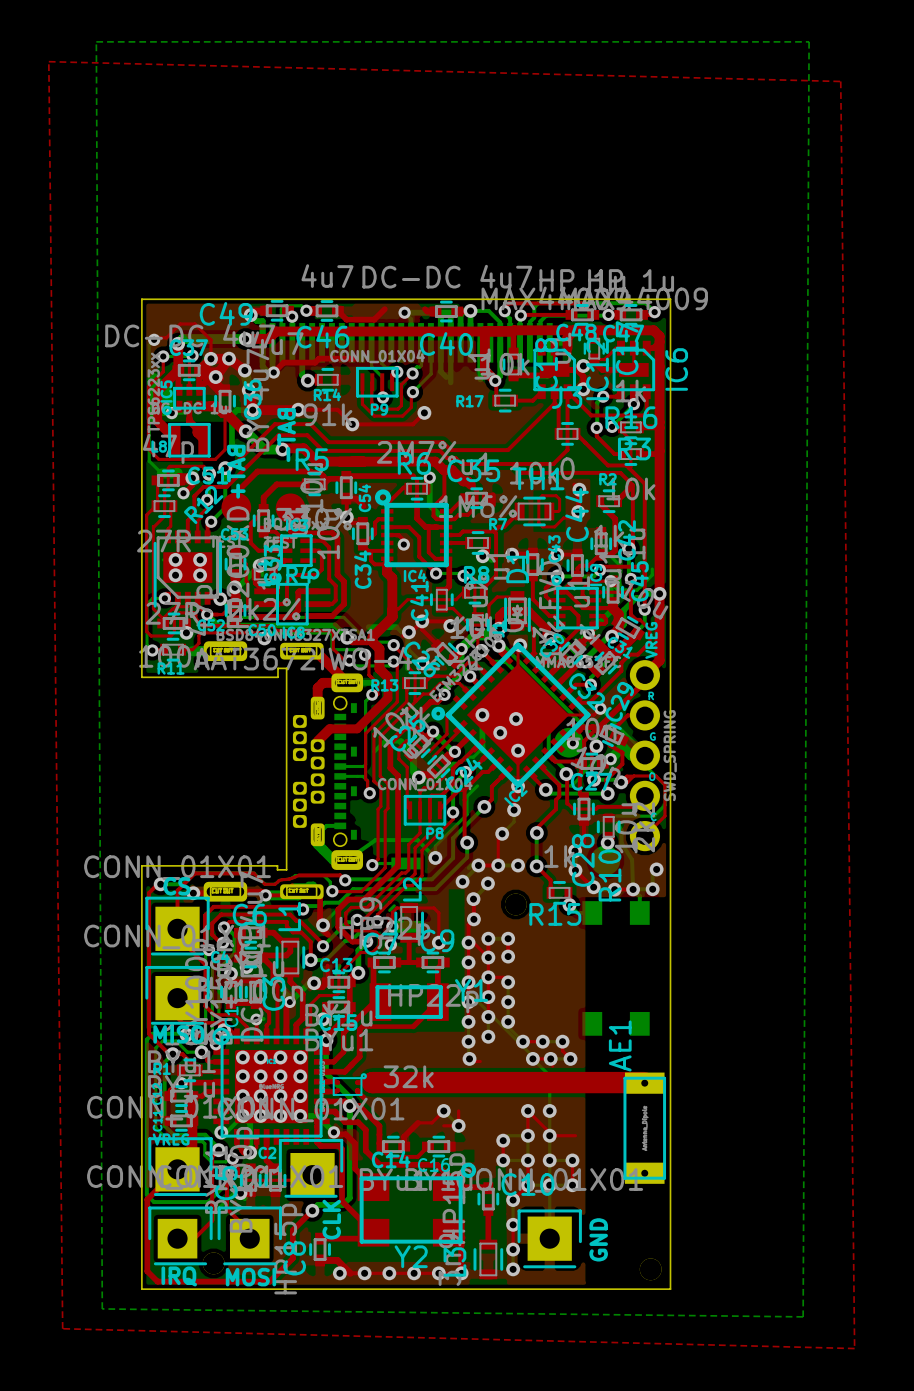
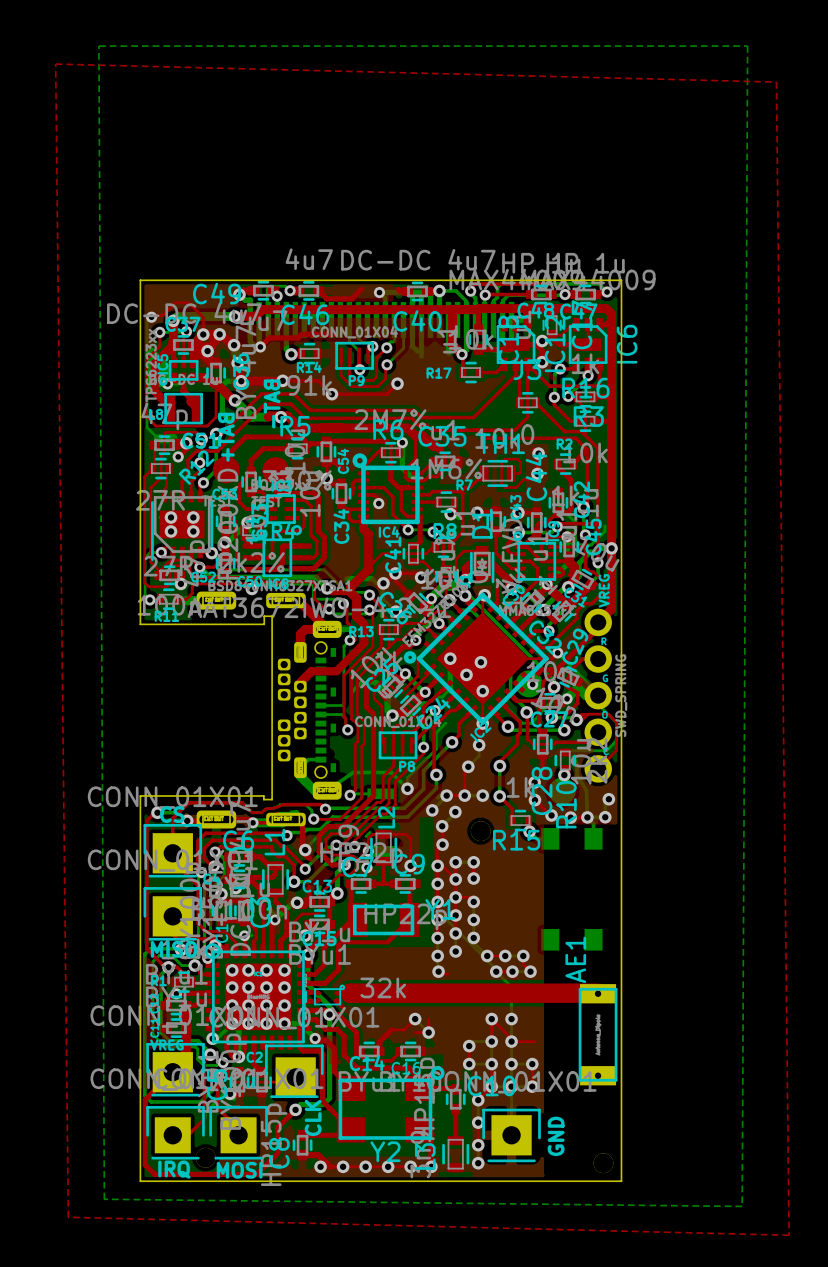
via position: (282, 449) -> (280, 417)

